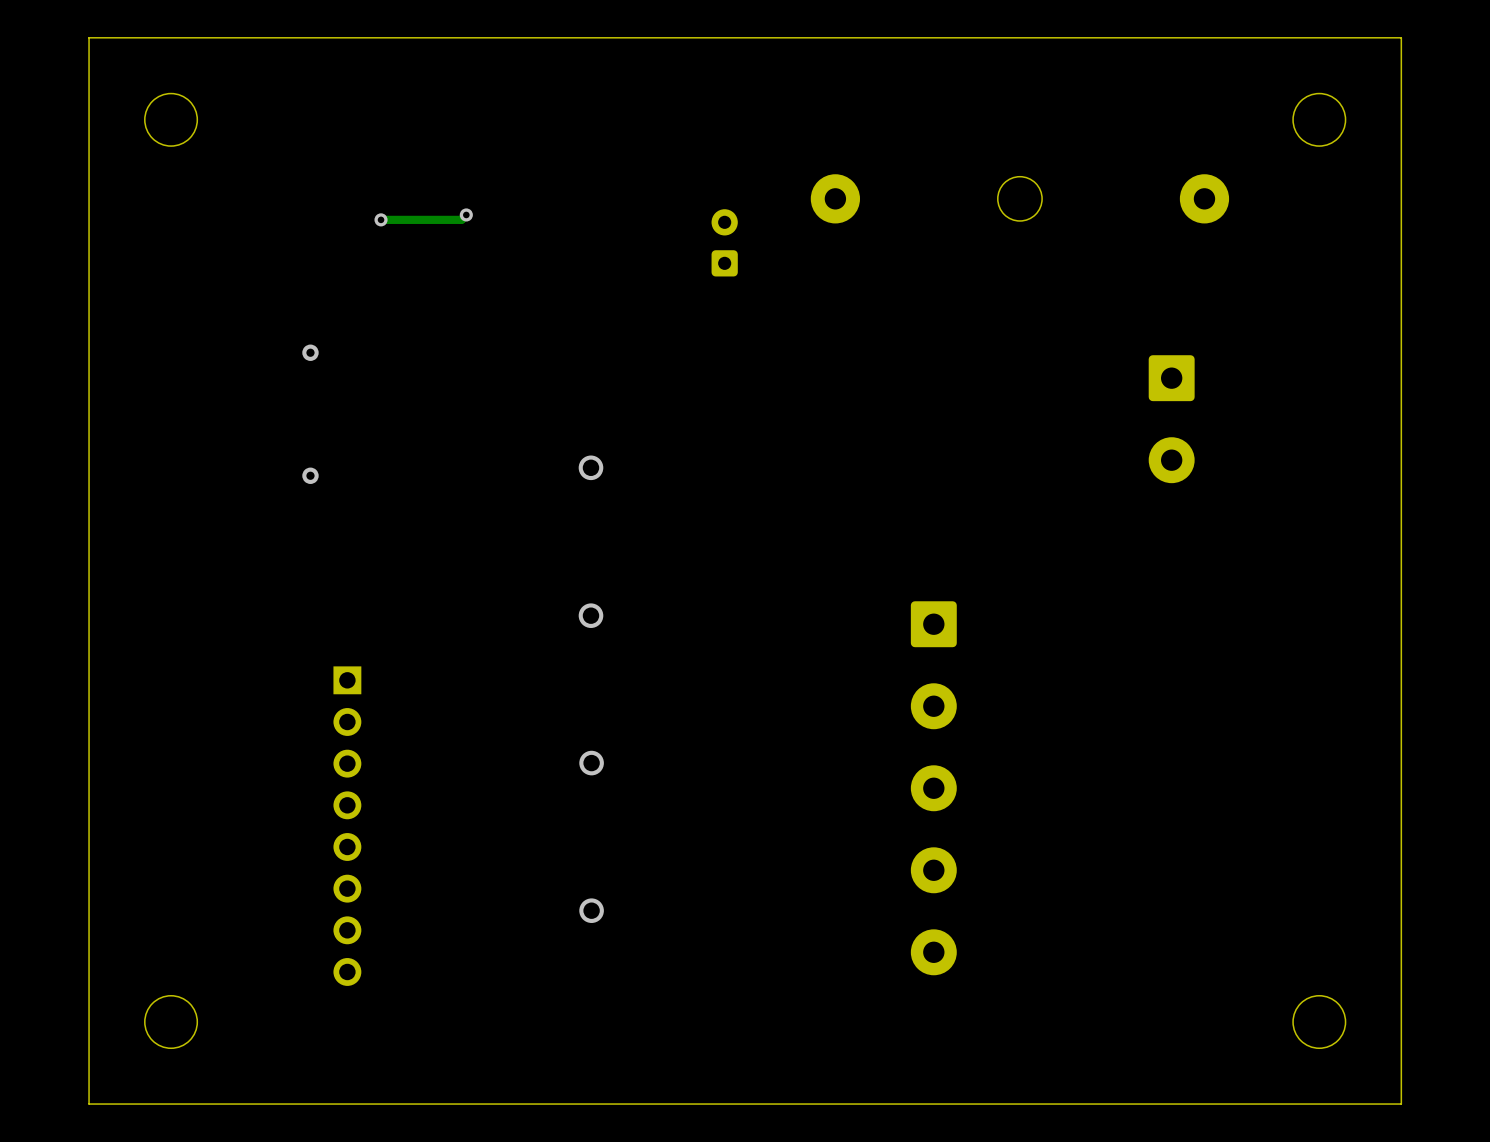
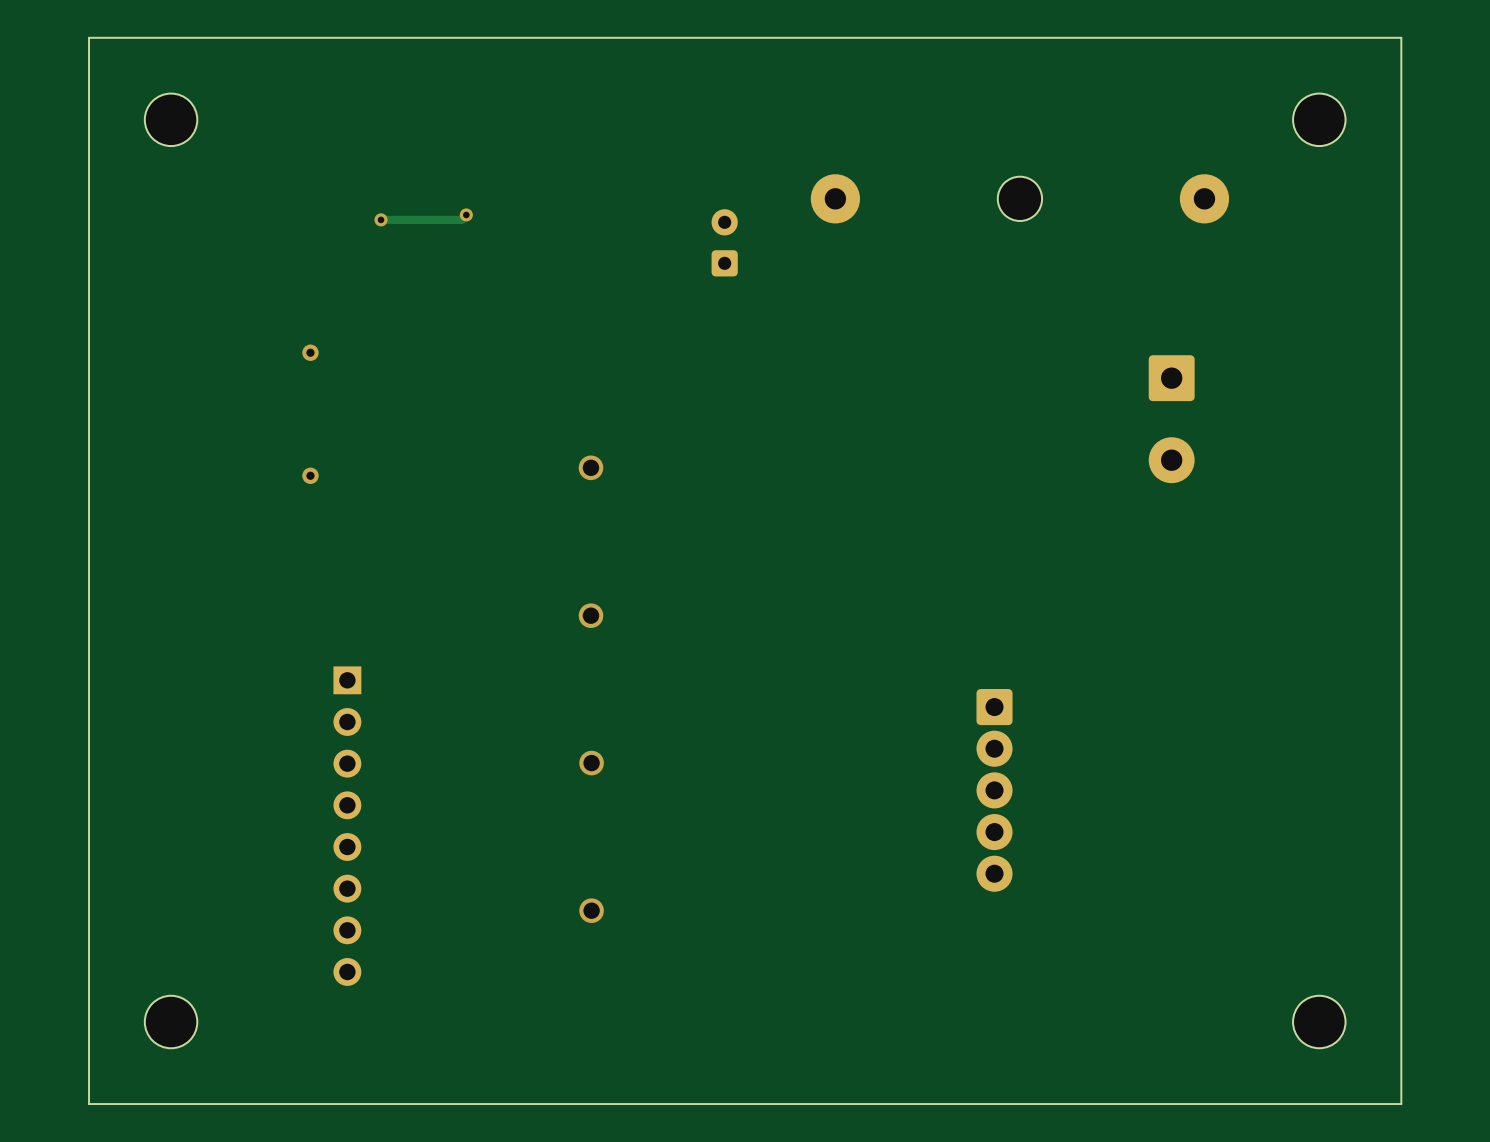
part: (933, 788) -> none
part: none -> (994, 790)

